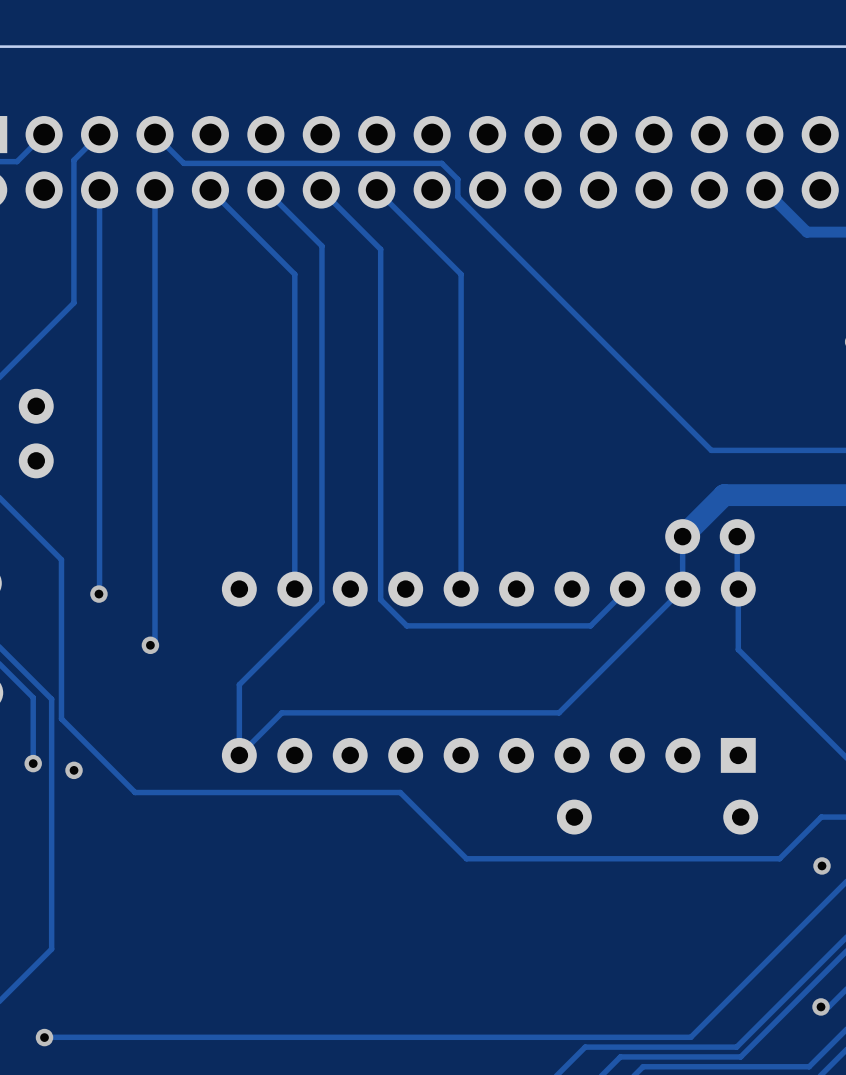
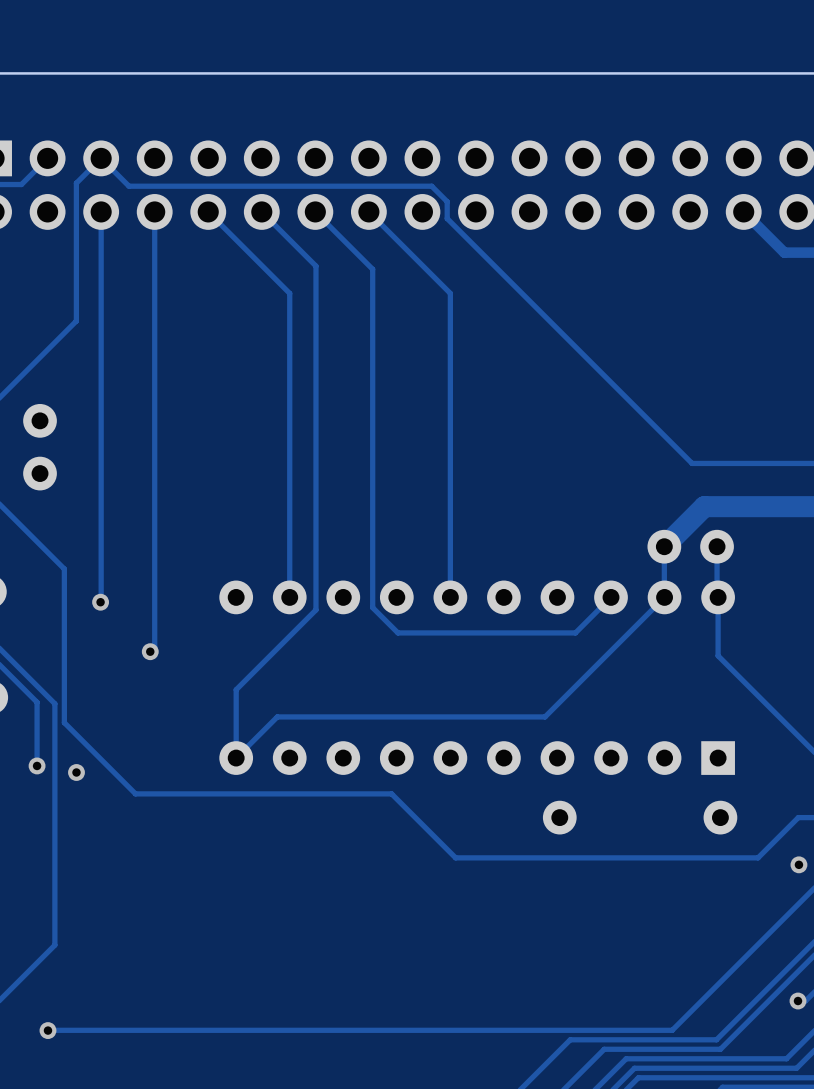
track: (155, 134) (183, 163) -> (101, 158) (128, 186) (182, 186)

